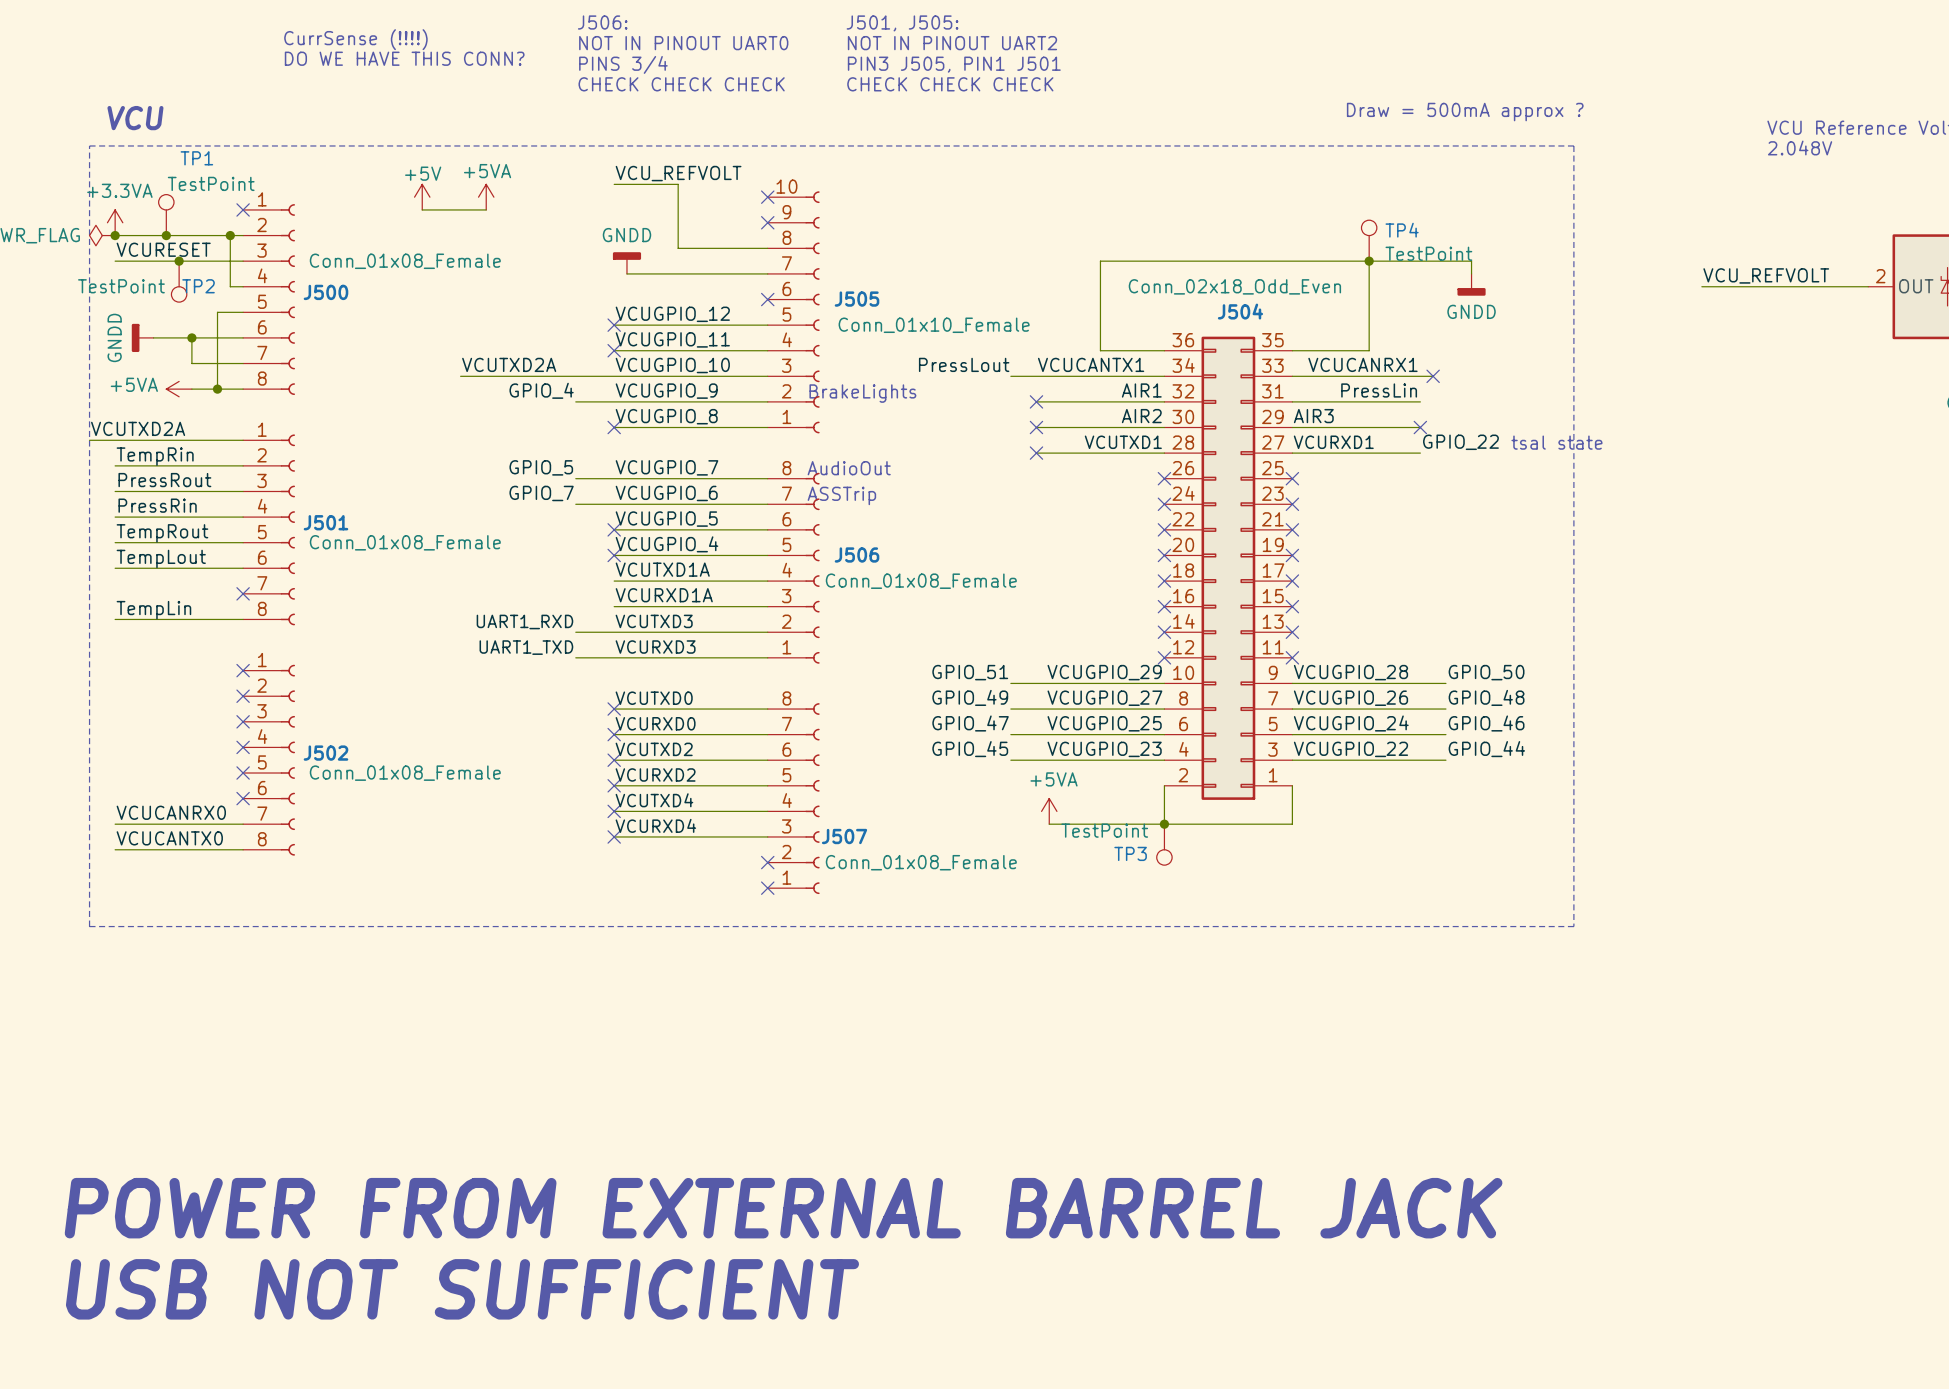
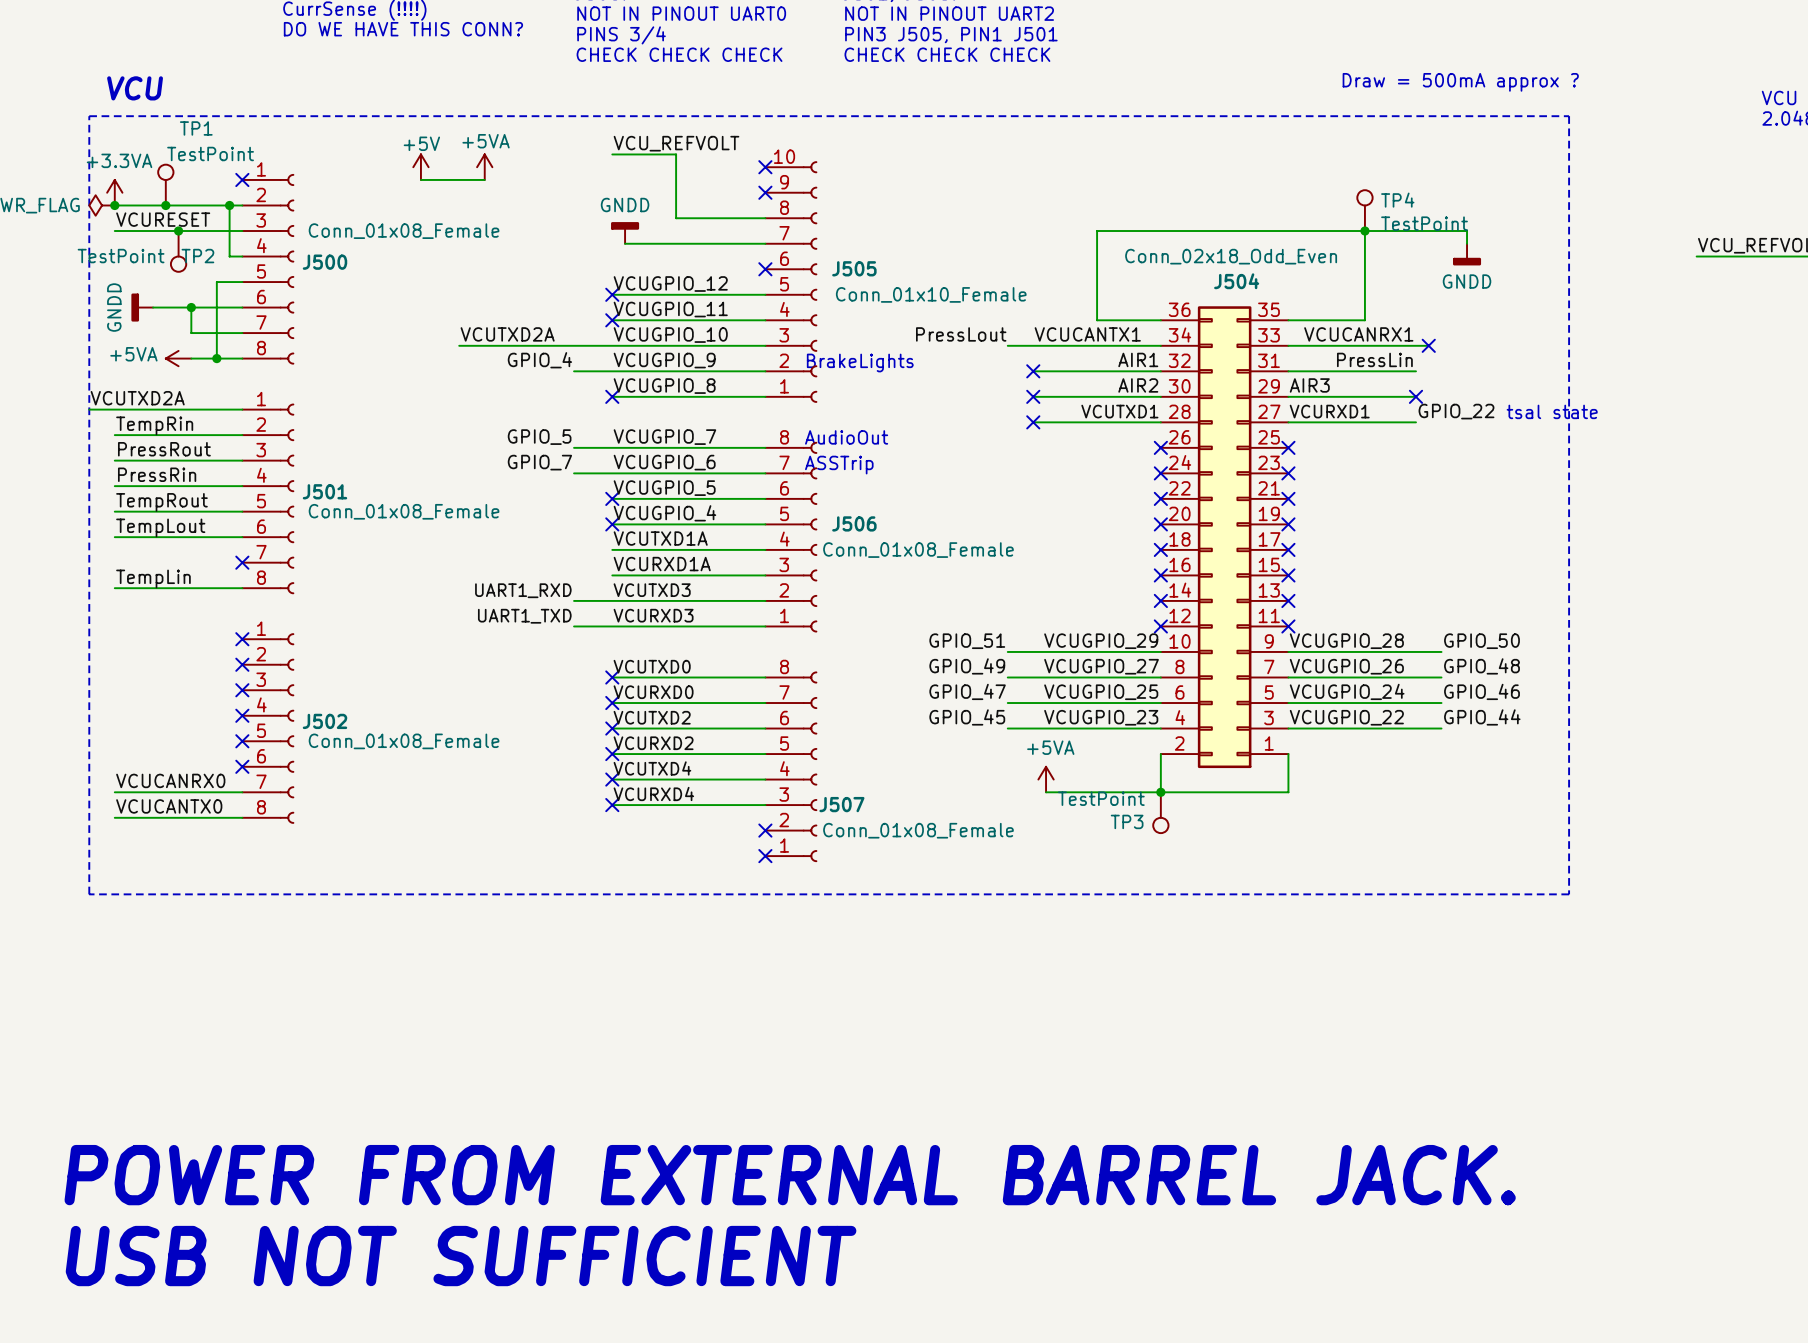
text: POWER FROM EXTERNAL BARREL JACK (783, 1208) -> POWER FROM EXTERNAL BARREL JACK. (790, 1175)

